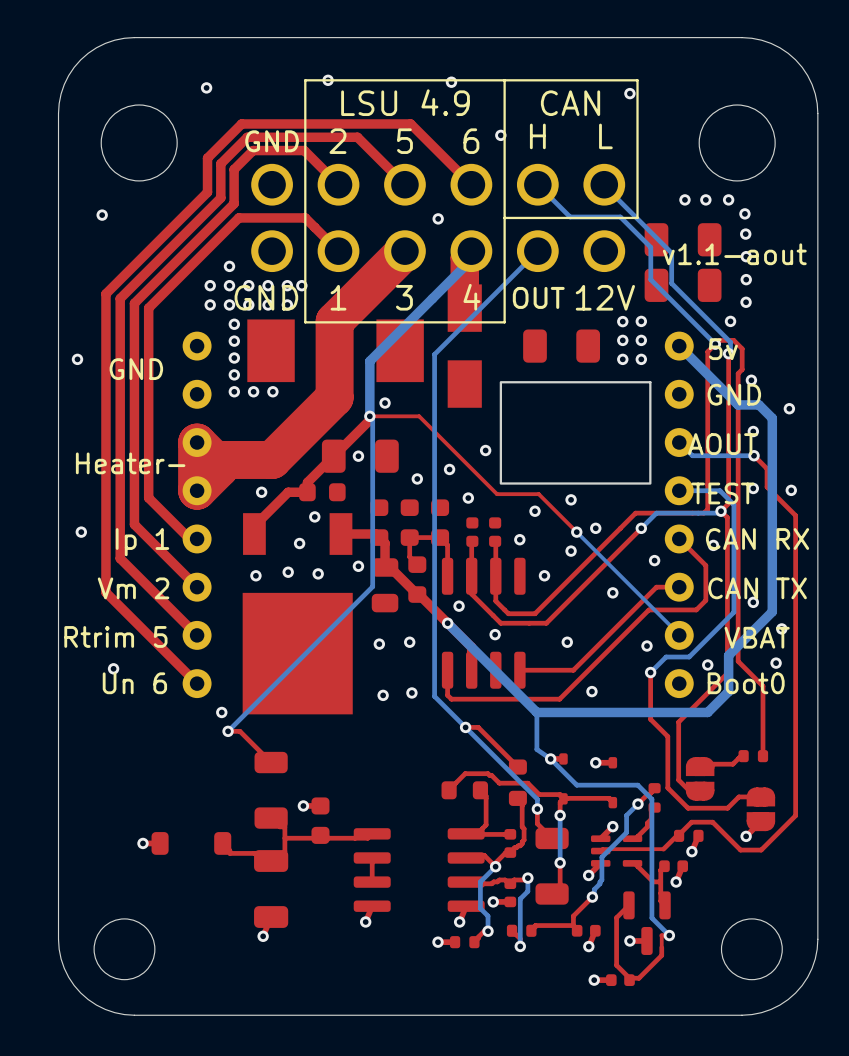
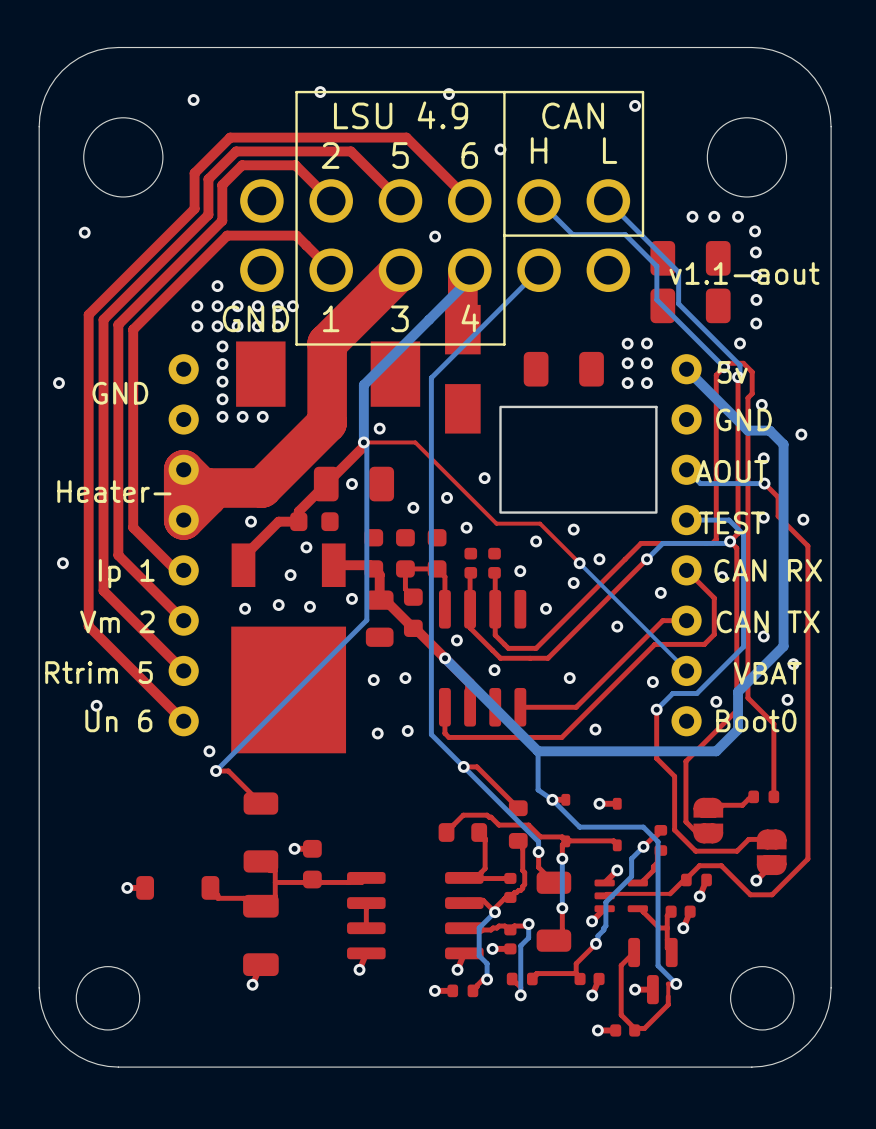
text: GND (272, 141) -> none
text: OUT (538, 297) -> none
text: 12V (605, 297) -> none

